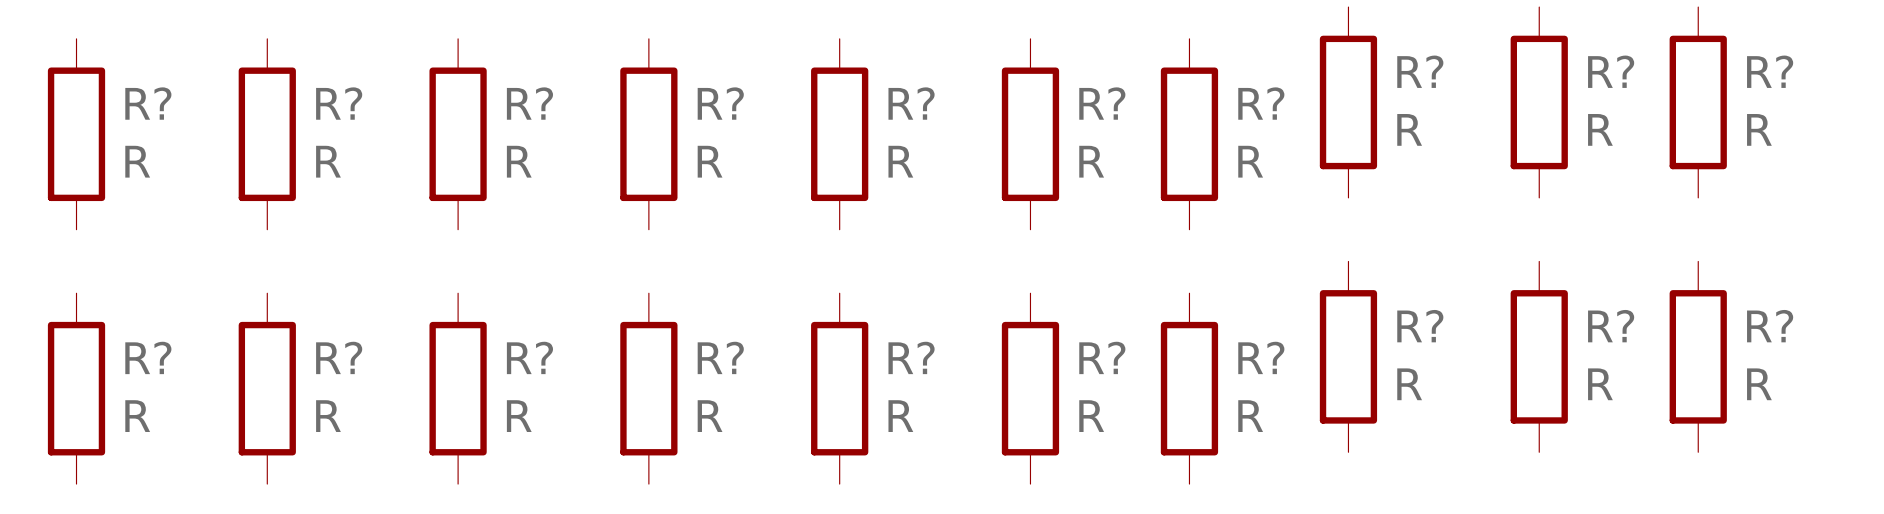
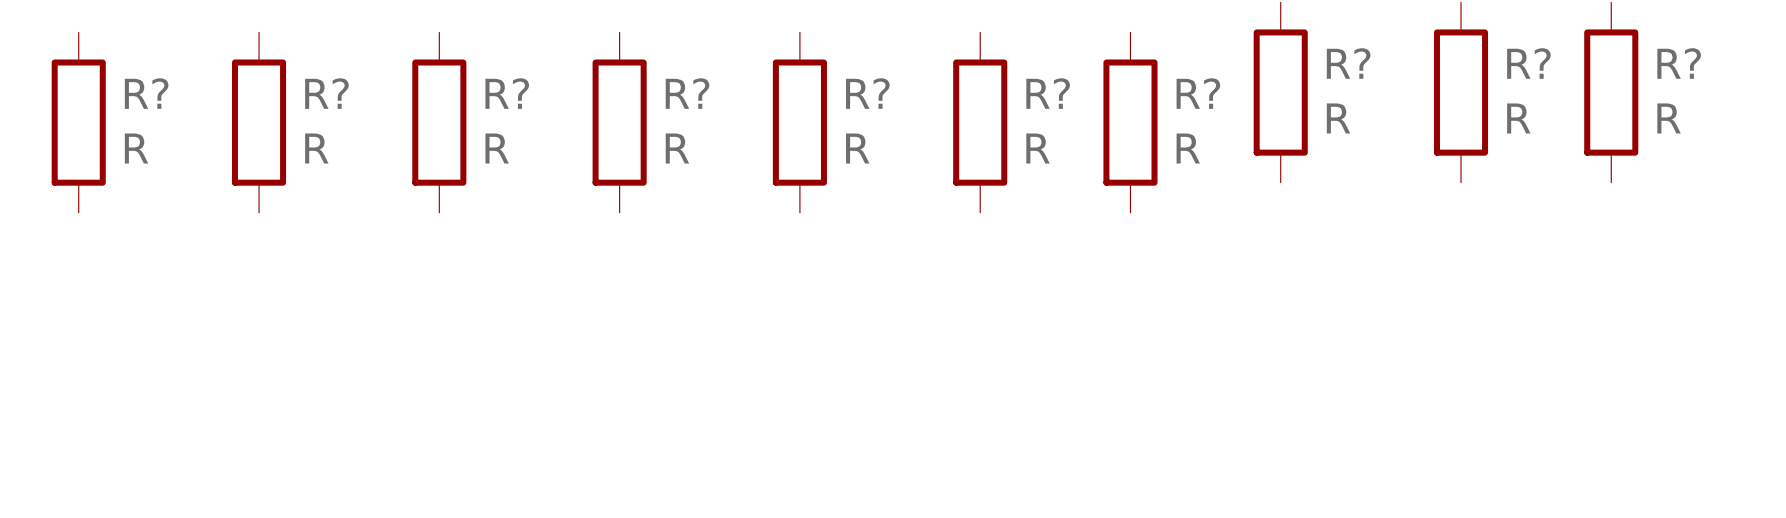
R?: R (1348, 356) -> none
R?: R (1539, 356) -> none
R?: R (1698, 356) -> none
R?: R (76, 388) -> none
R?: R (267, 388) -> none
R?: R (458, 388) -> none
R?: R (648, 388) -> none
R?: R (839, 388) -> none
R?: R (1030, 388) -> none
R?: R (1189, 388) -> none

